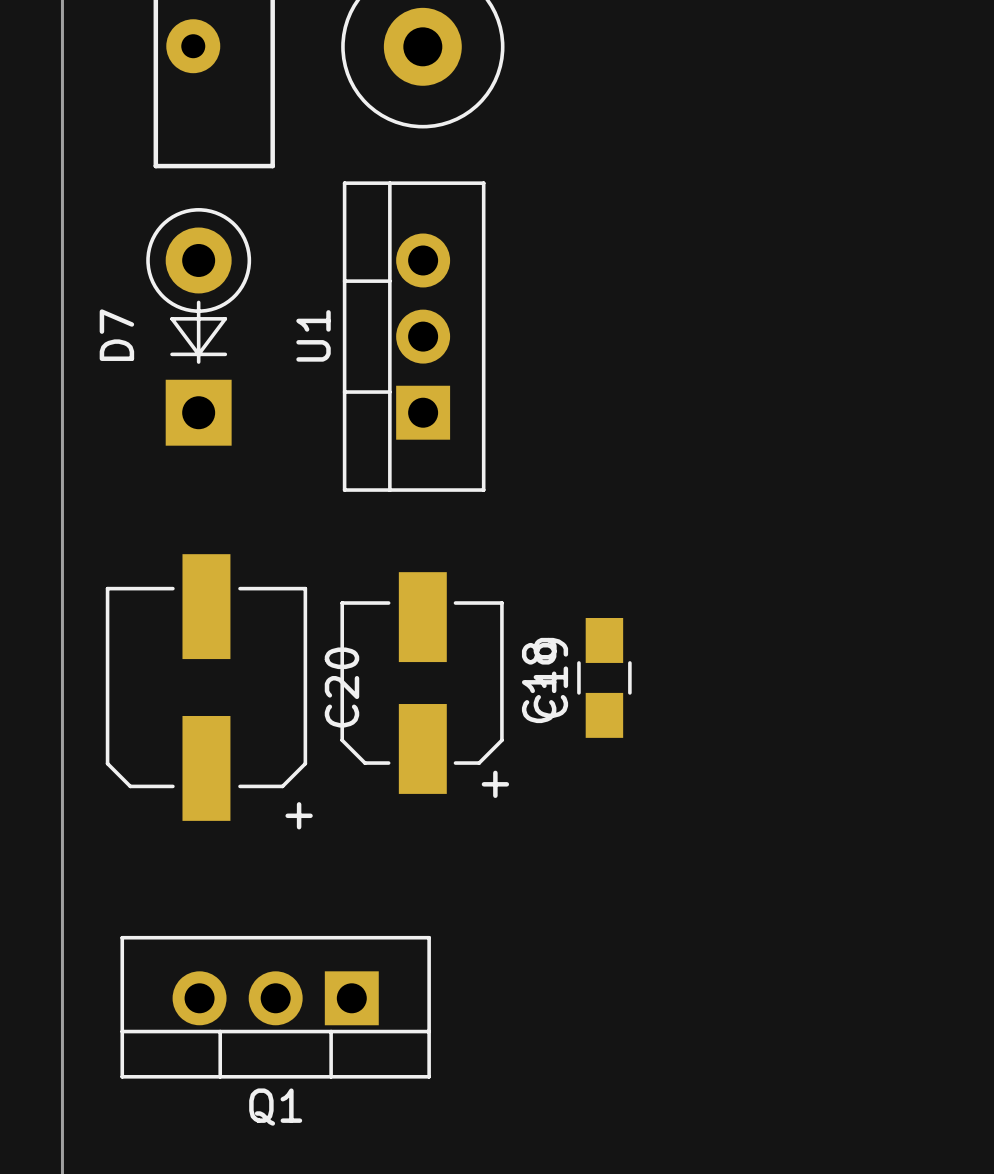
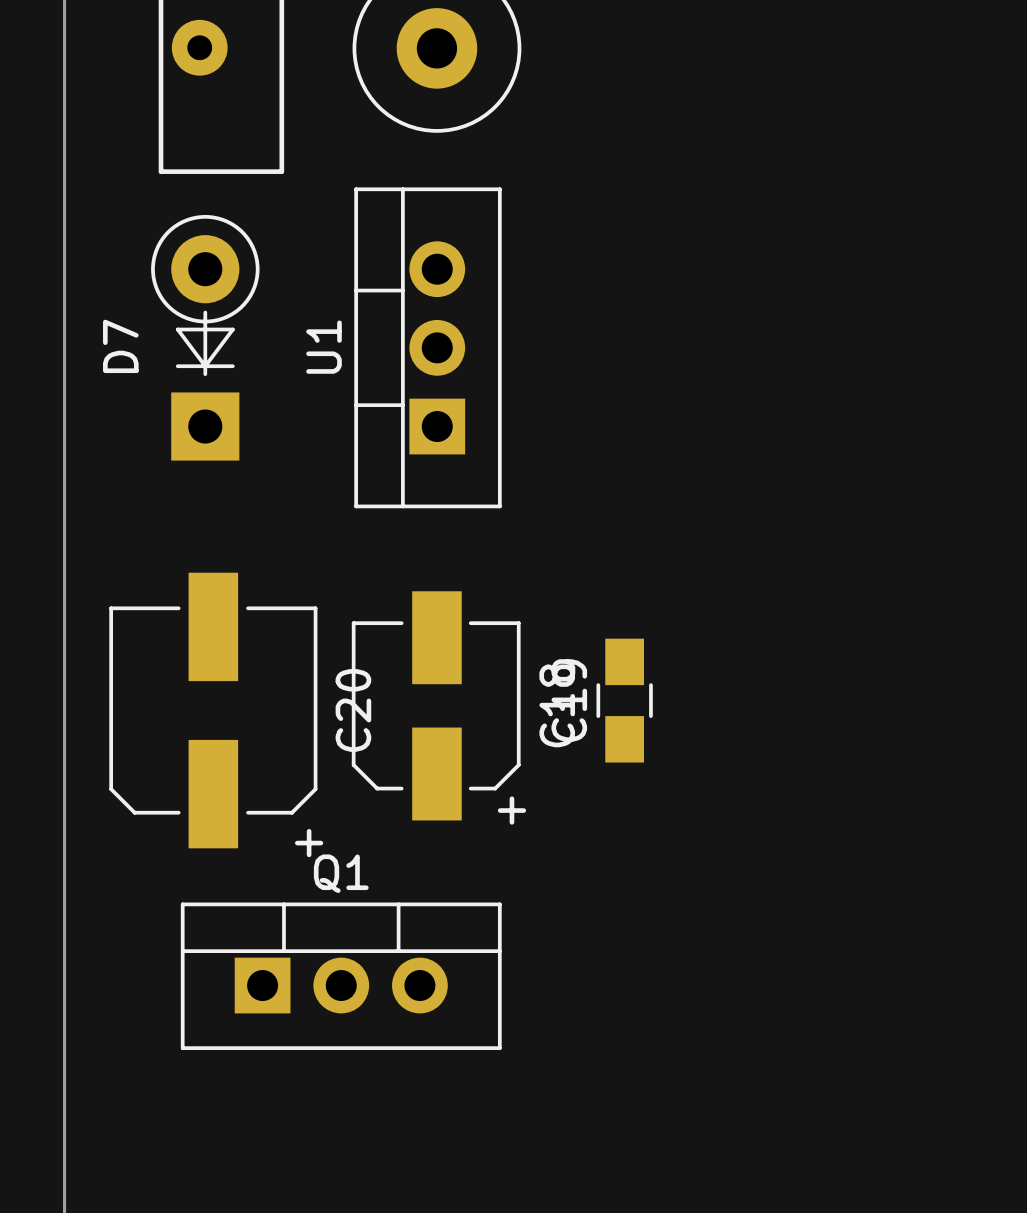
Q1 rotation: 0° (275, 1007) -> 180° (341, 976)

